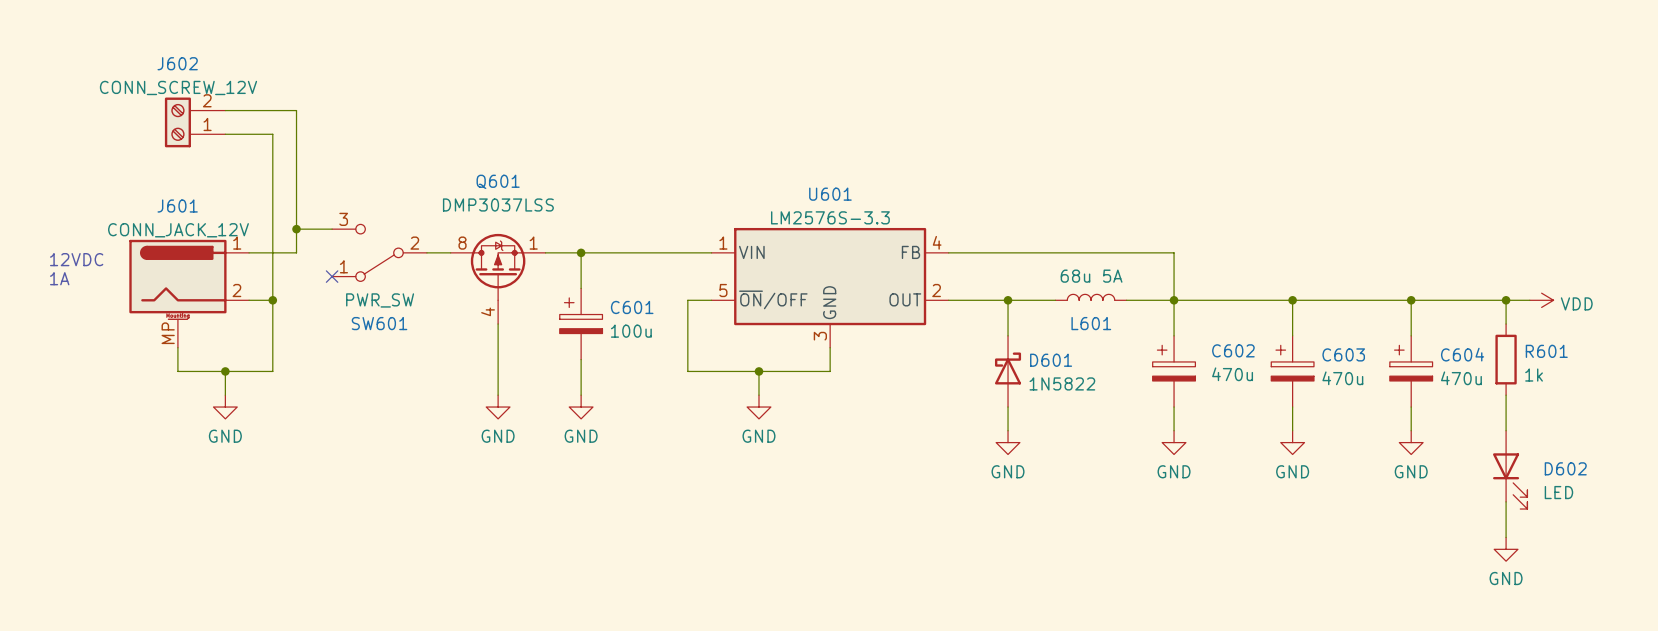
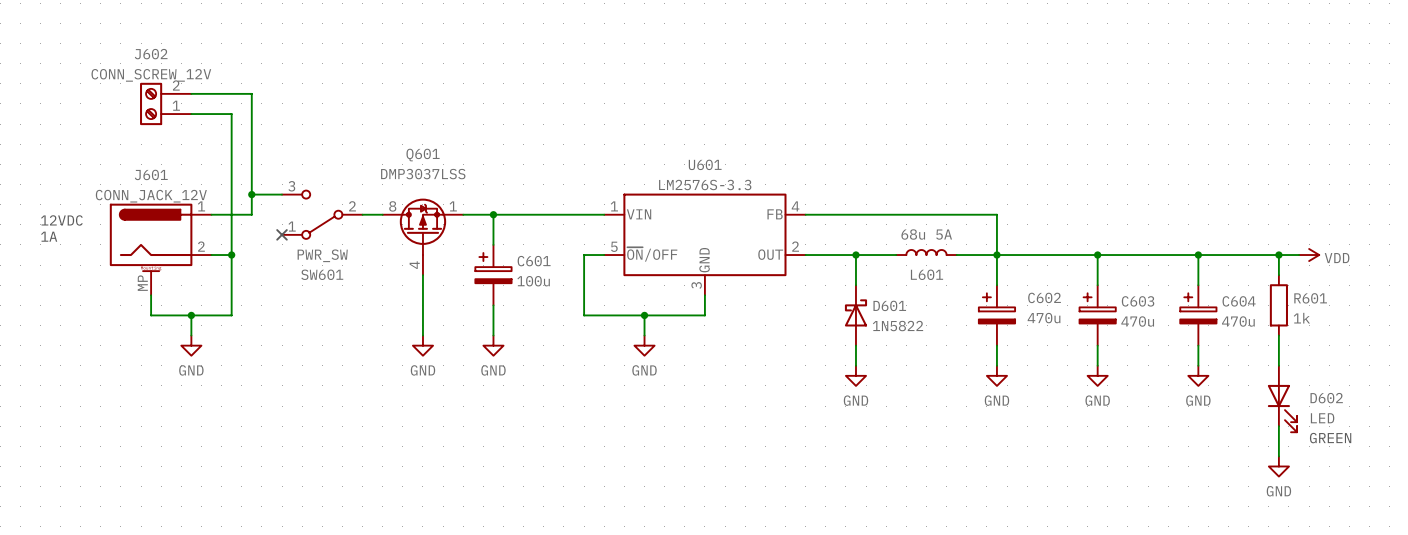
text: none -> GREEN (1330, 438)

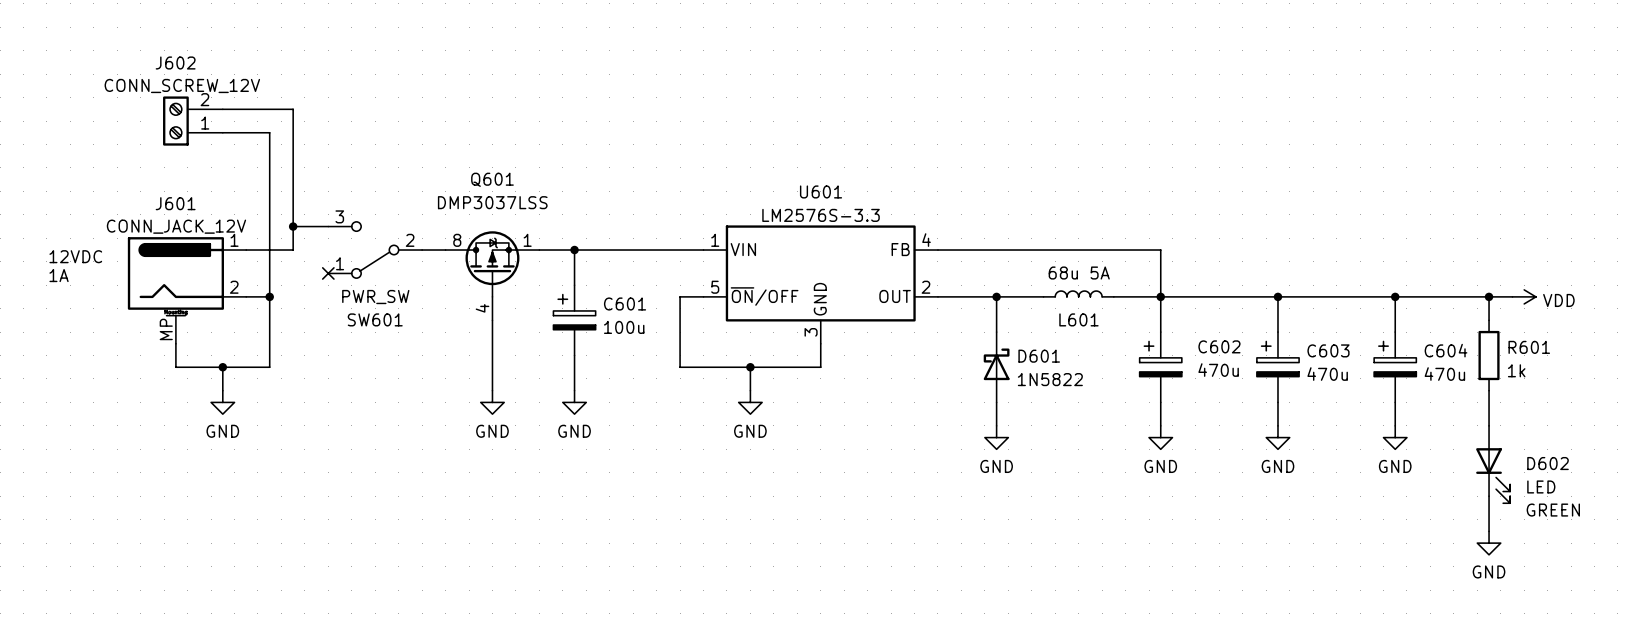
J602 text: none -> CONN_SCREW_12V (182, 85)
J602 value: CONN_SCREW_12V (151, 75) -> none
J601 text: none -> CONN_JACK_12V (176, 226)
J601 value: CONN_JACK_12V (151, 196) -> none

